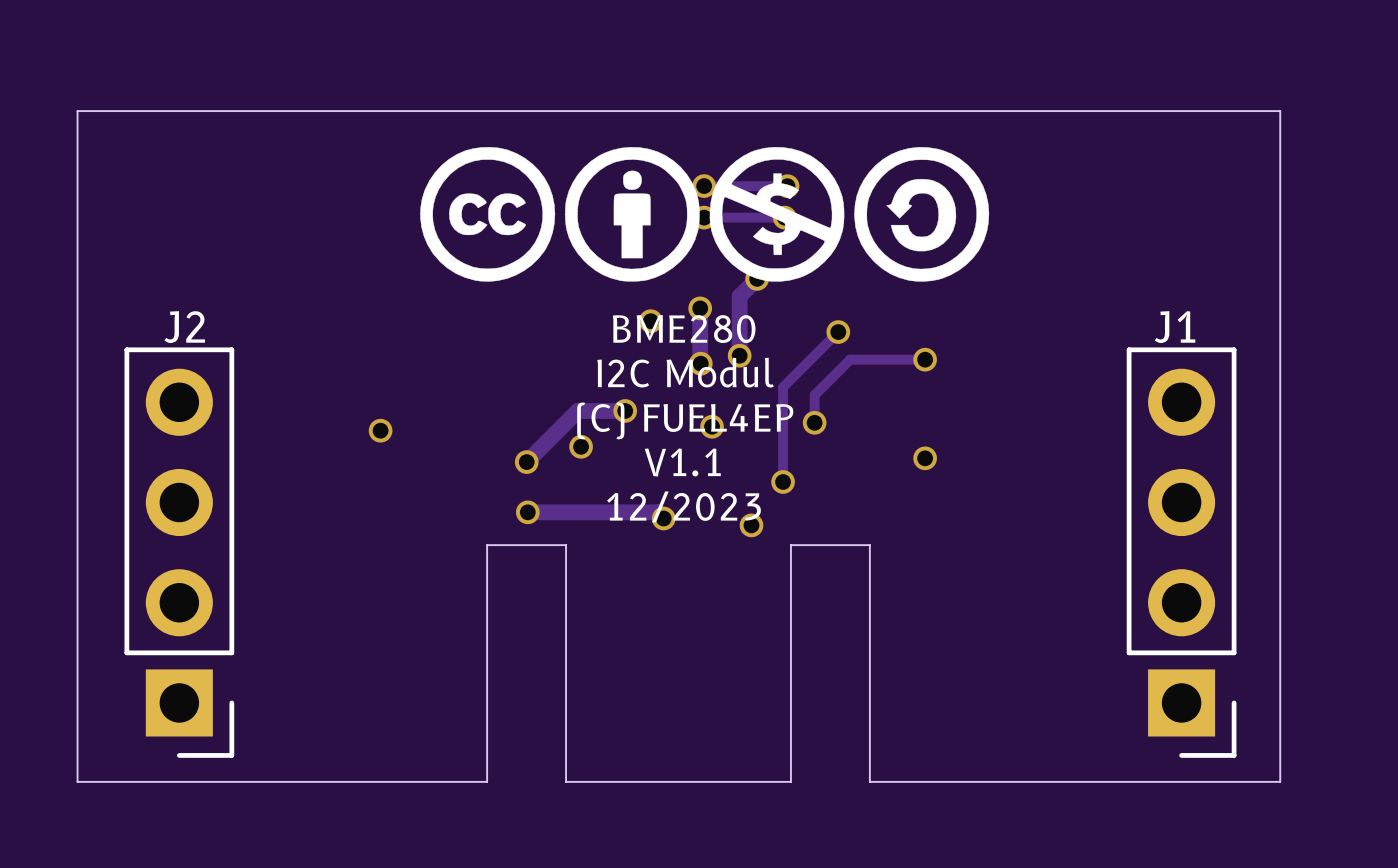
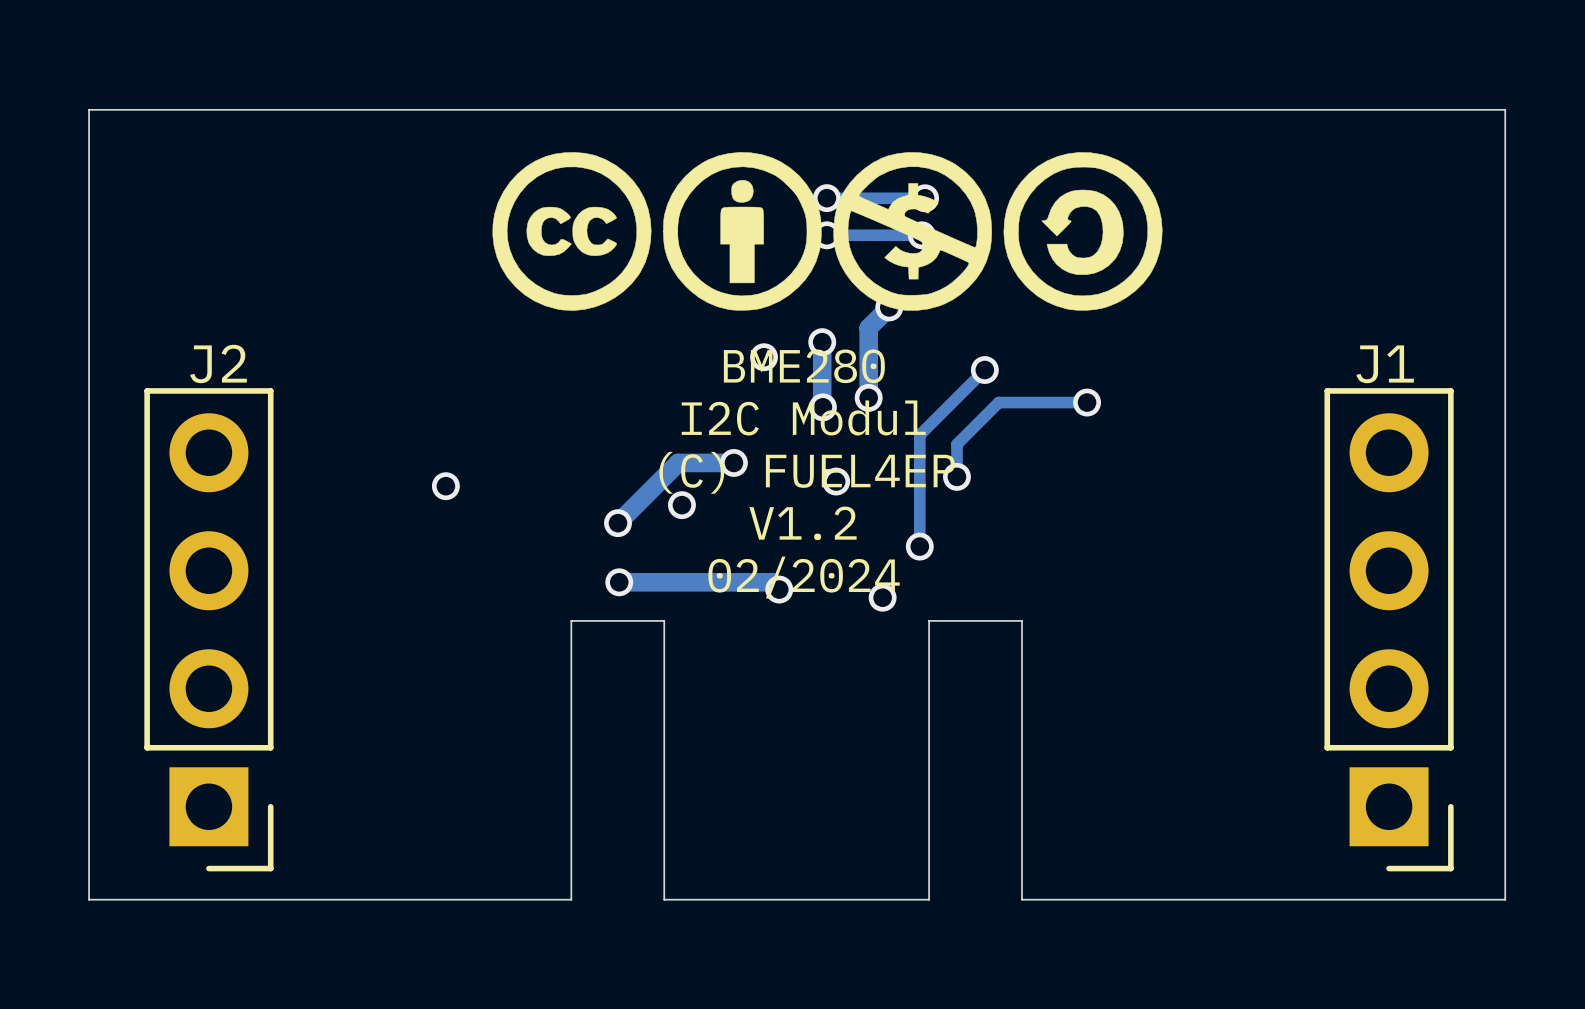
via: (925, 458) -> none
text: V1.1 (682, 462) -> V1.2 (803, 523)
text: 12/2023 (684, 506) -> 02/2024 (804, 577)

